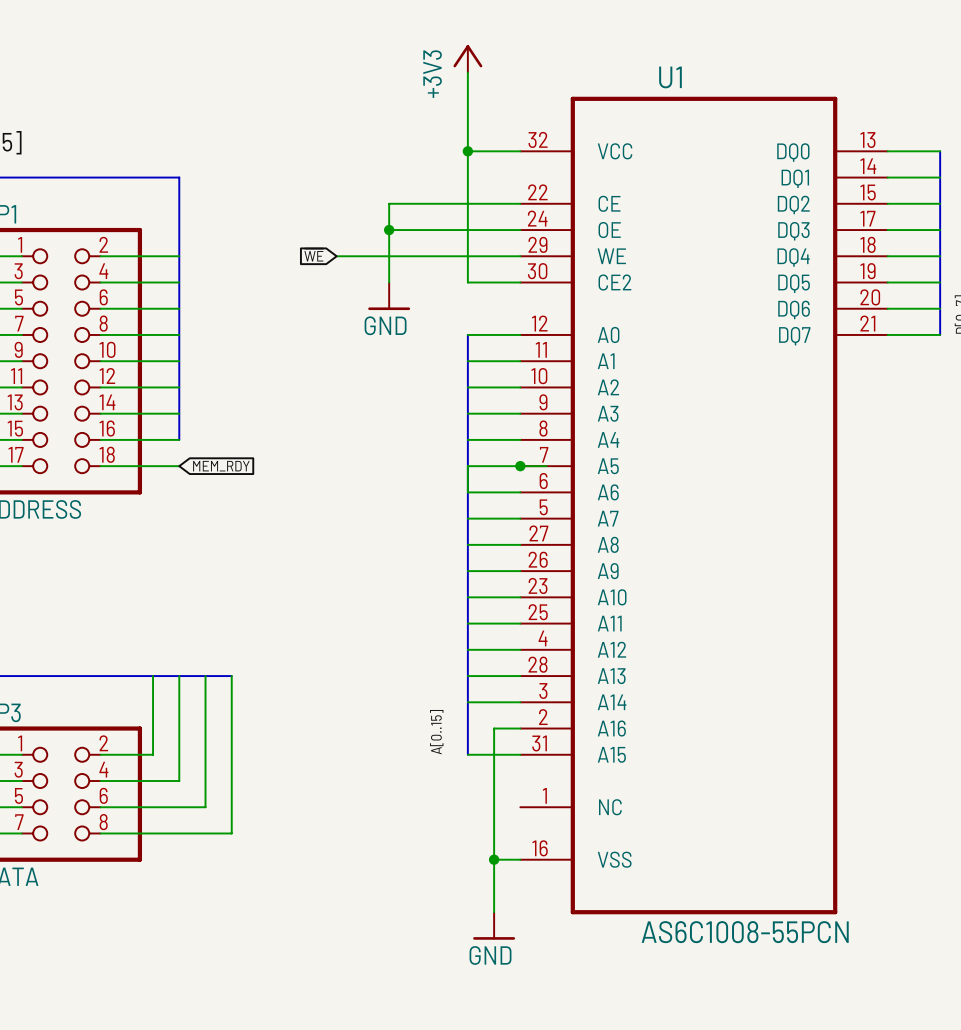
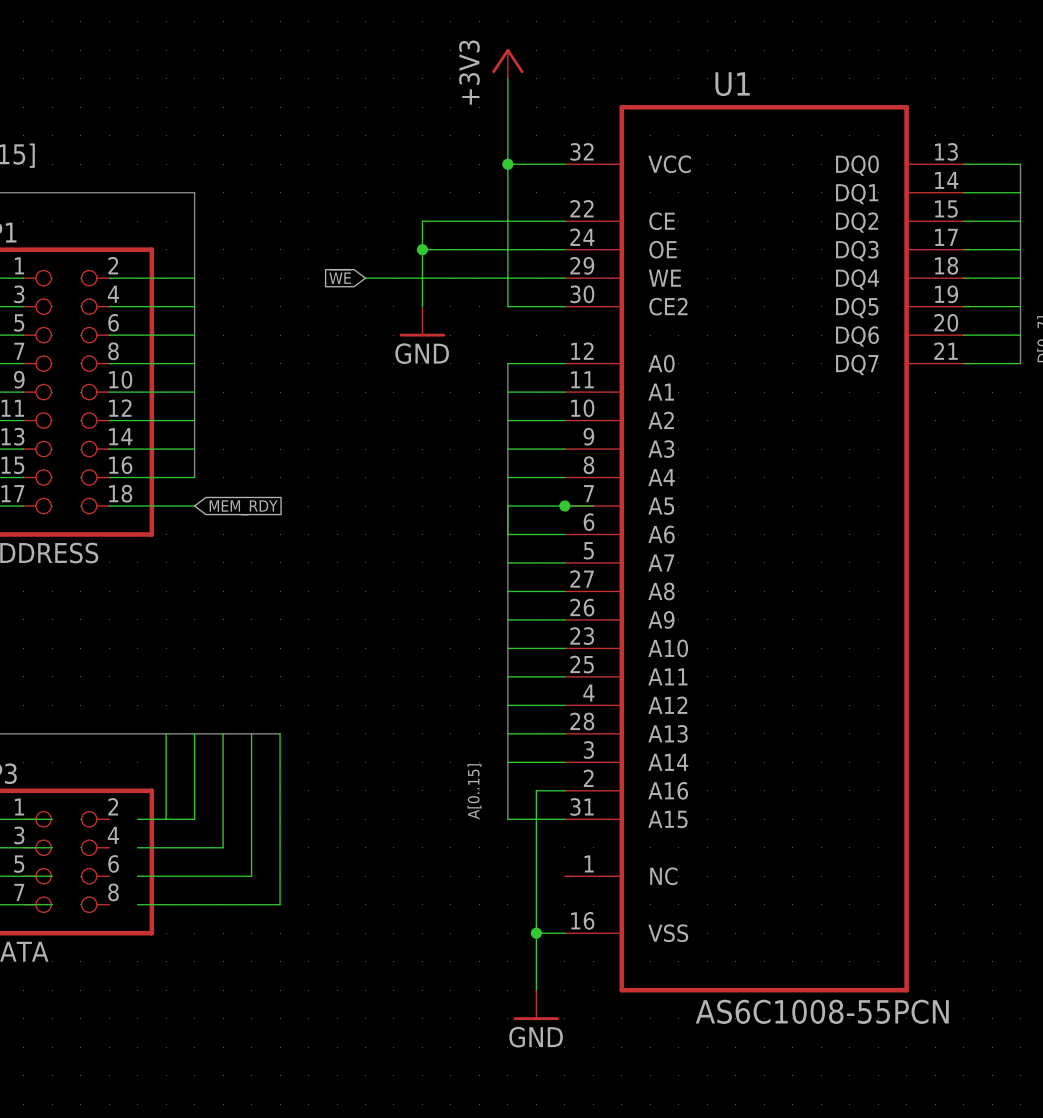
bus: none -> (251, 733) (280, 733)
wire: none -> (280, 733) (280, 904) (251, 904)
wire: (100, 754) (126, 754) -> (23, 819) (52, 819)
wire: (179, 754) (179, 781) -> (194, 819) (166, 819)
wire: (100, 781) (126, 781) -> (23, 847) (52, 847)
wire: (205, 781) (205, 807) -> (223, 847) (194, 847)
wire: (100, 807) (126, 807) -> (23, 876) (52, 876)
wire: (231, 807) (231, 833) -> (251, 876) (223, 876)
wire: (100, 833) (126, 833) -> (23, 904) (52, 904)

